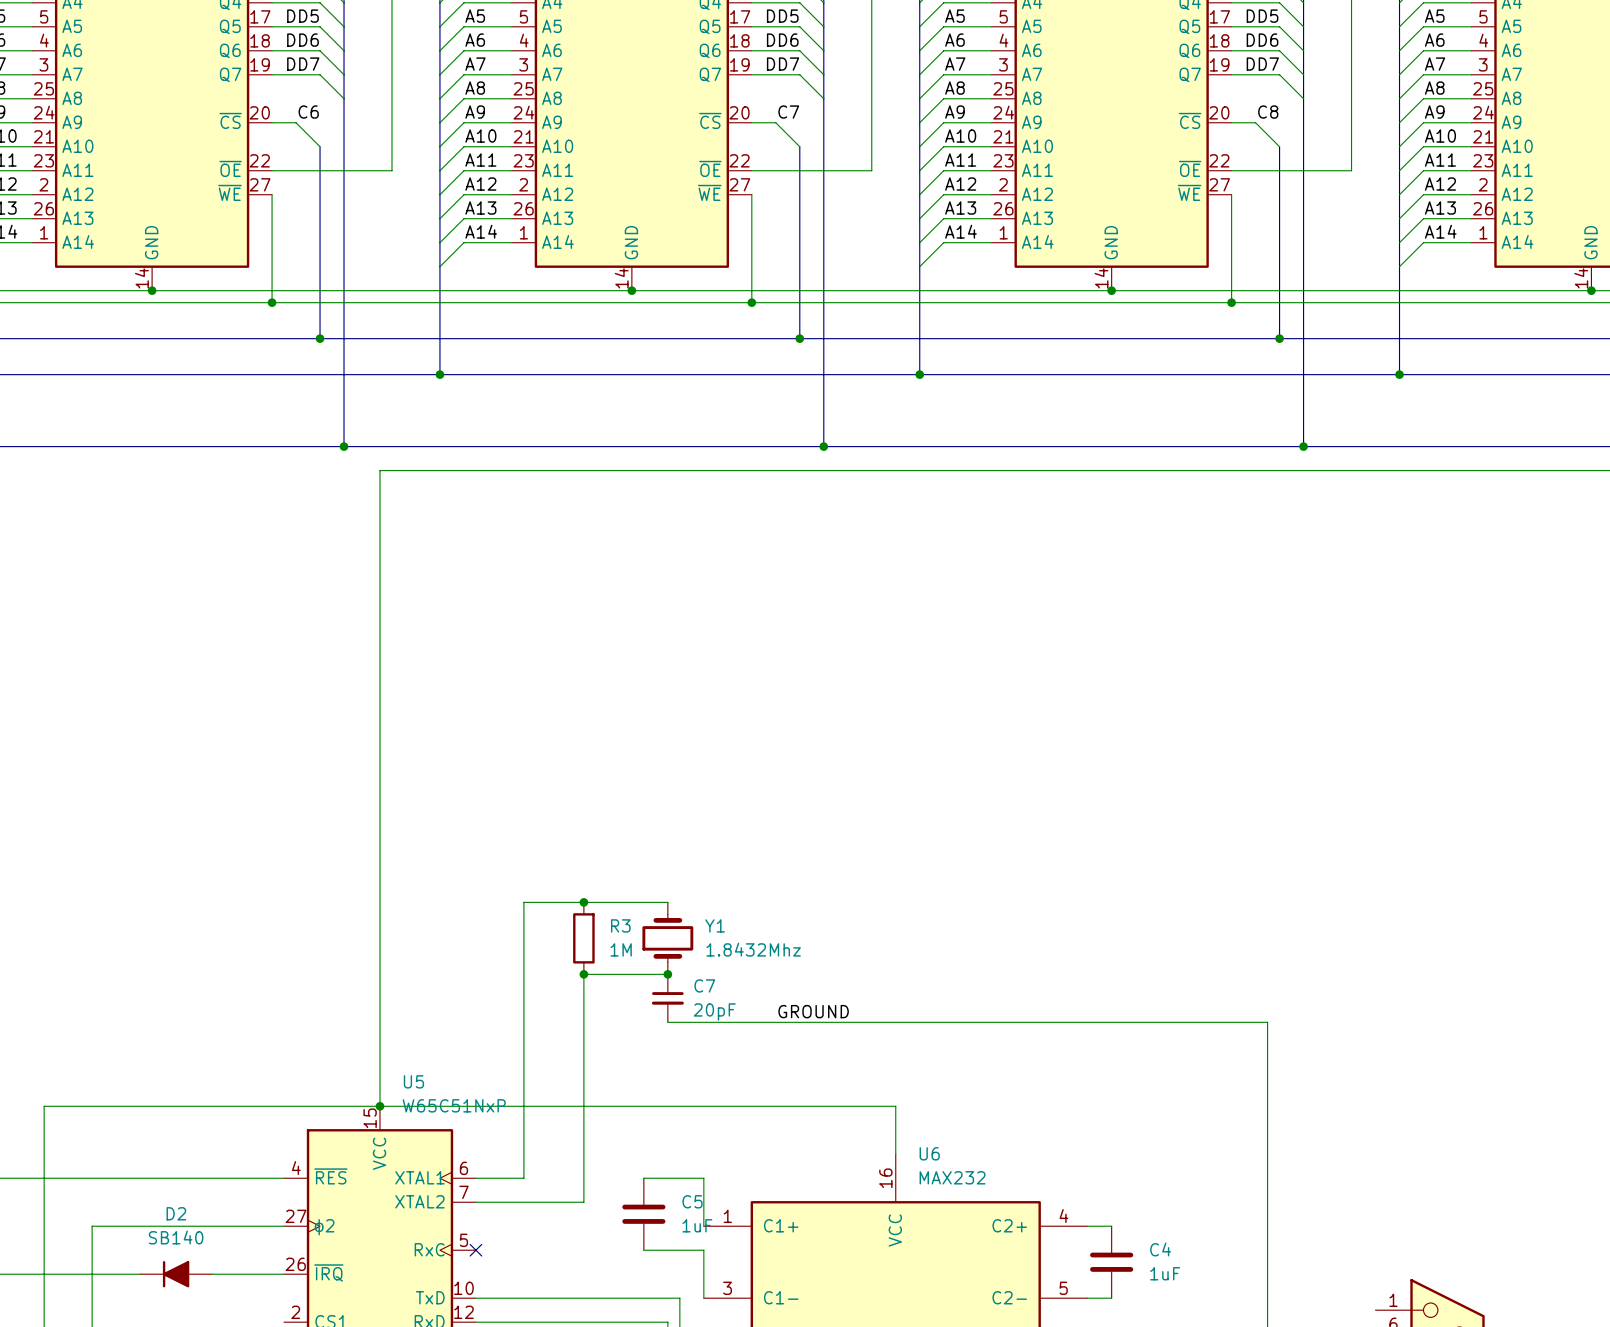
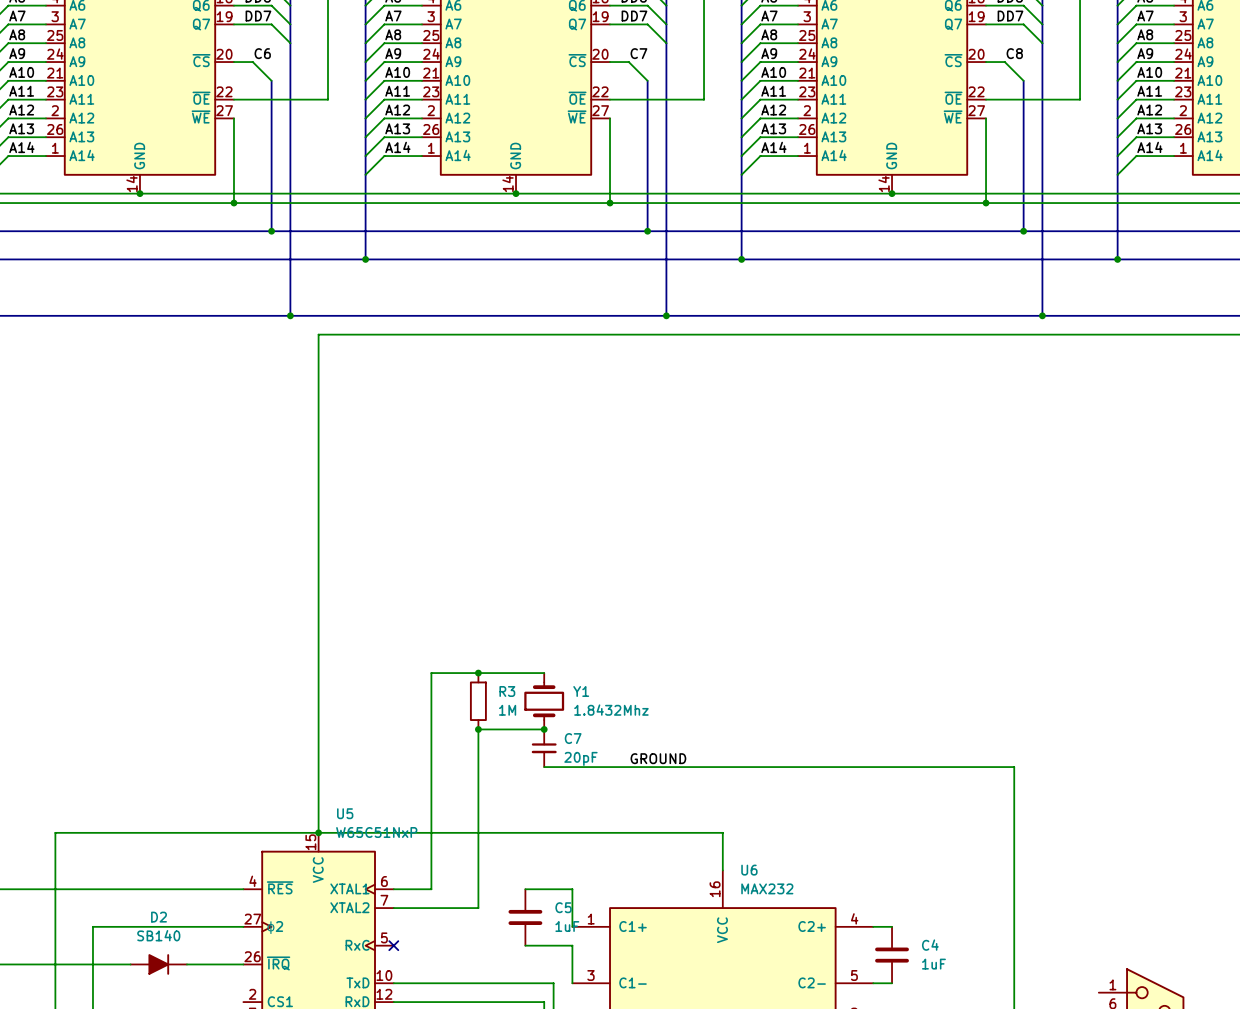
D2 rotation: 0° (176, 1274) -> 180° (158, 964)

